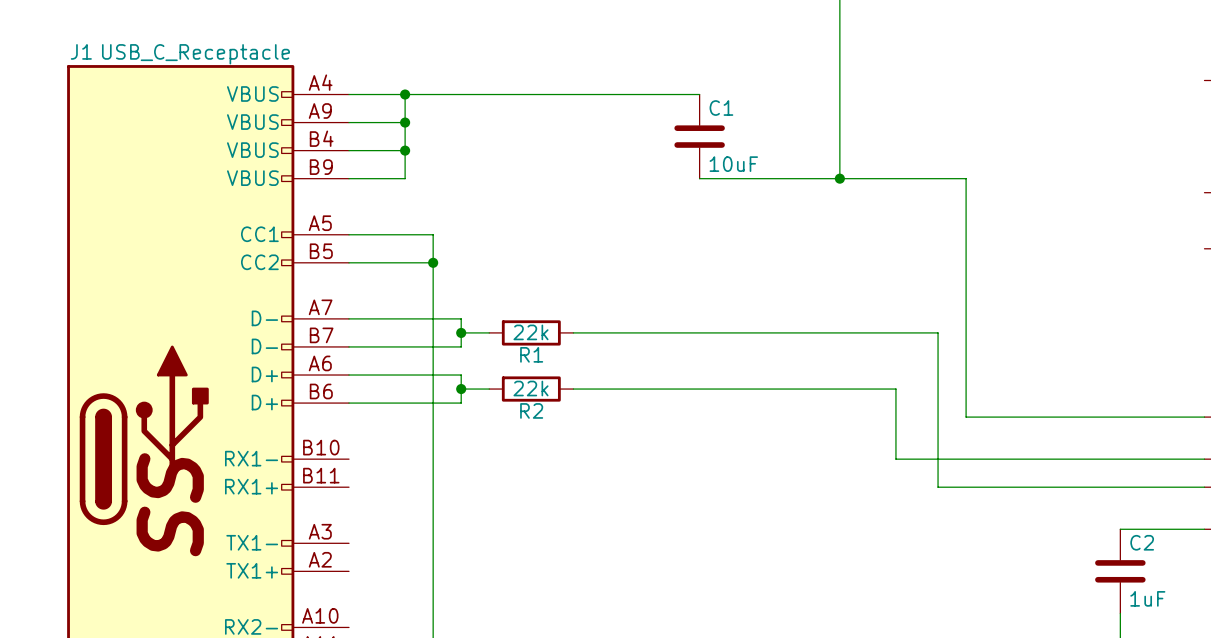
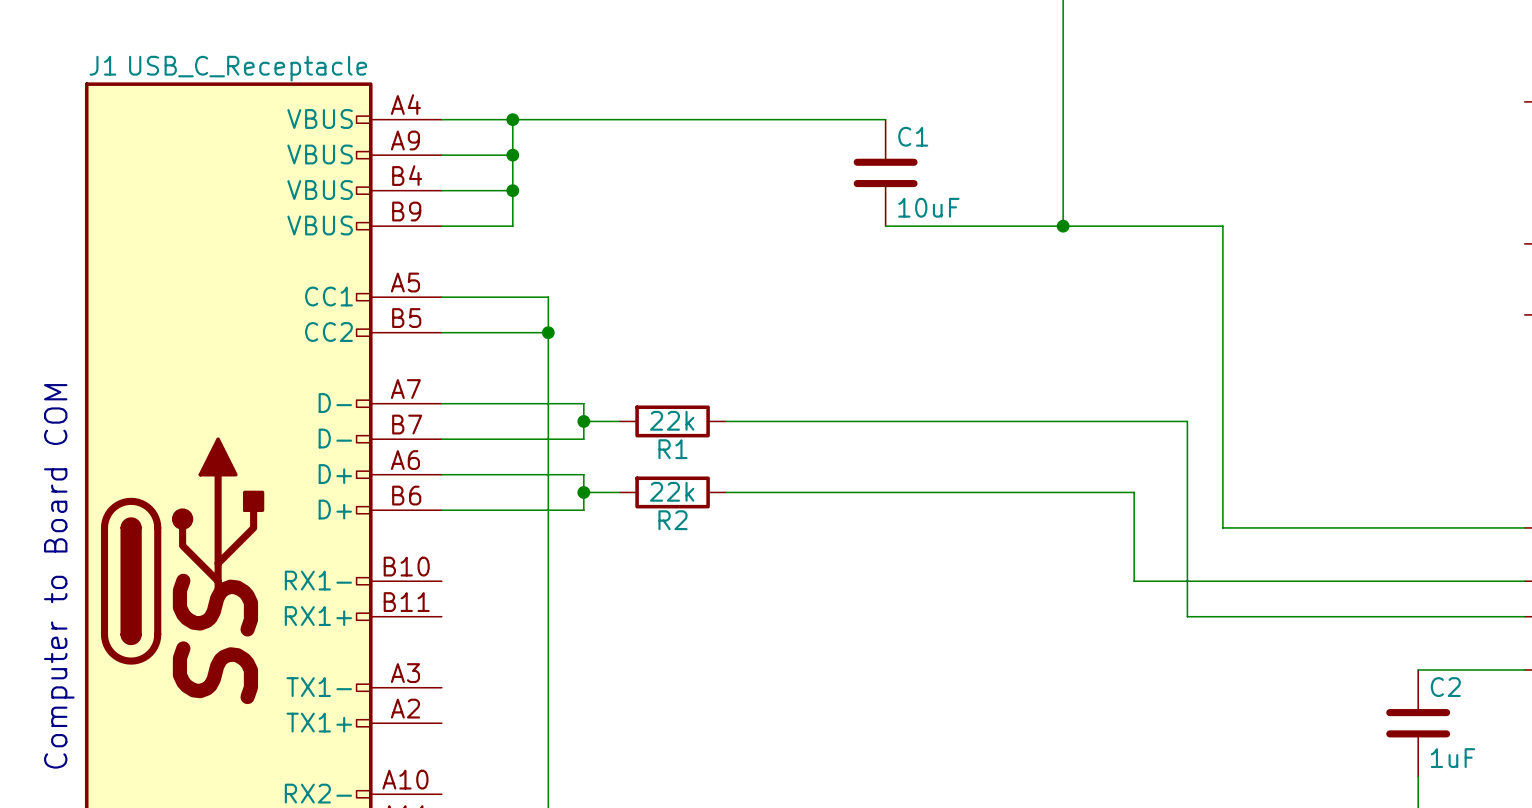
text: none -> Computer to Board COM (59, 576)

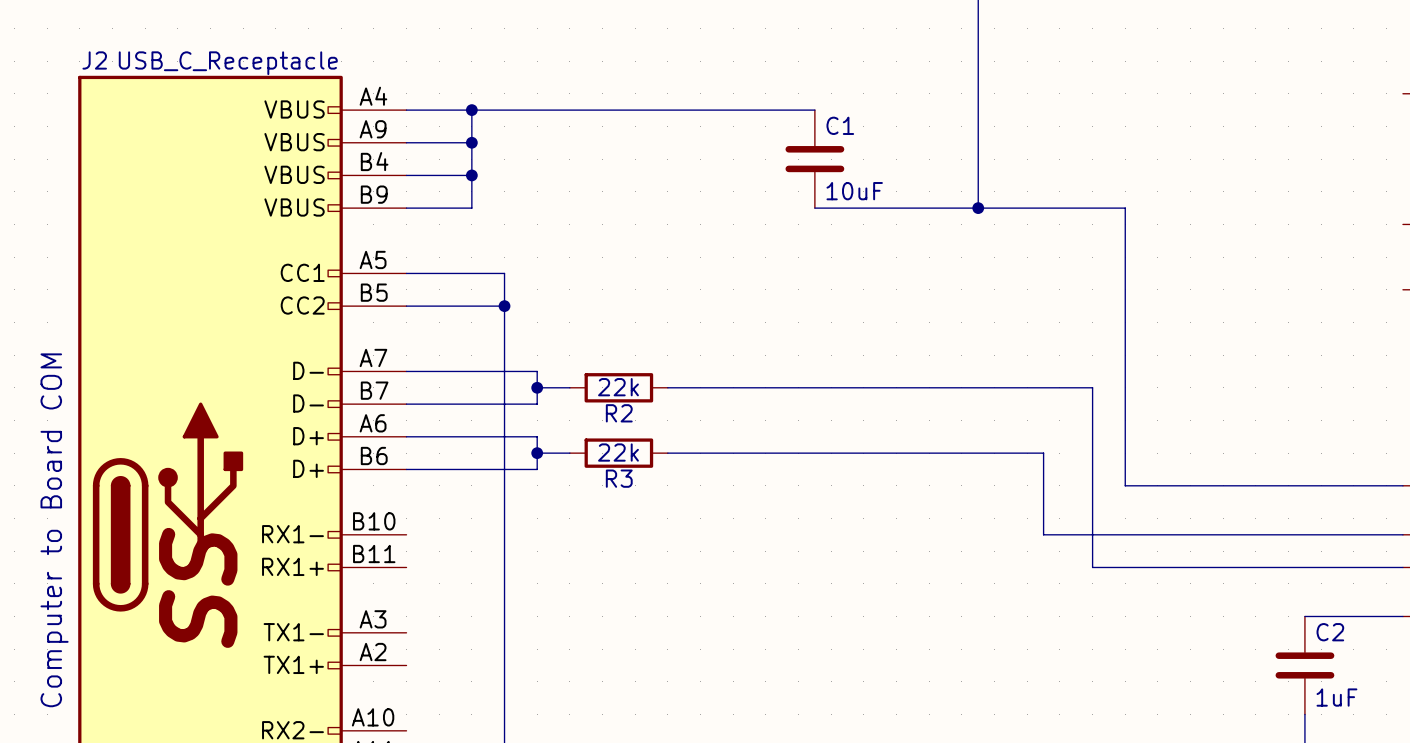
J1 name: J1 (102, 65) -> J2 (94, 60)
R1 name: R1 (673, 449) -> R2 (619, 413)
R2 name: R2 (673, 520) -> R3 (619, 478)

